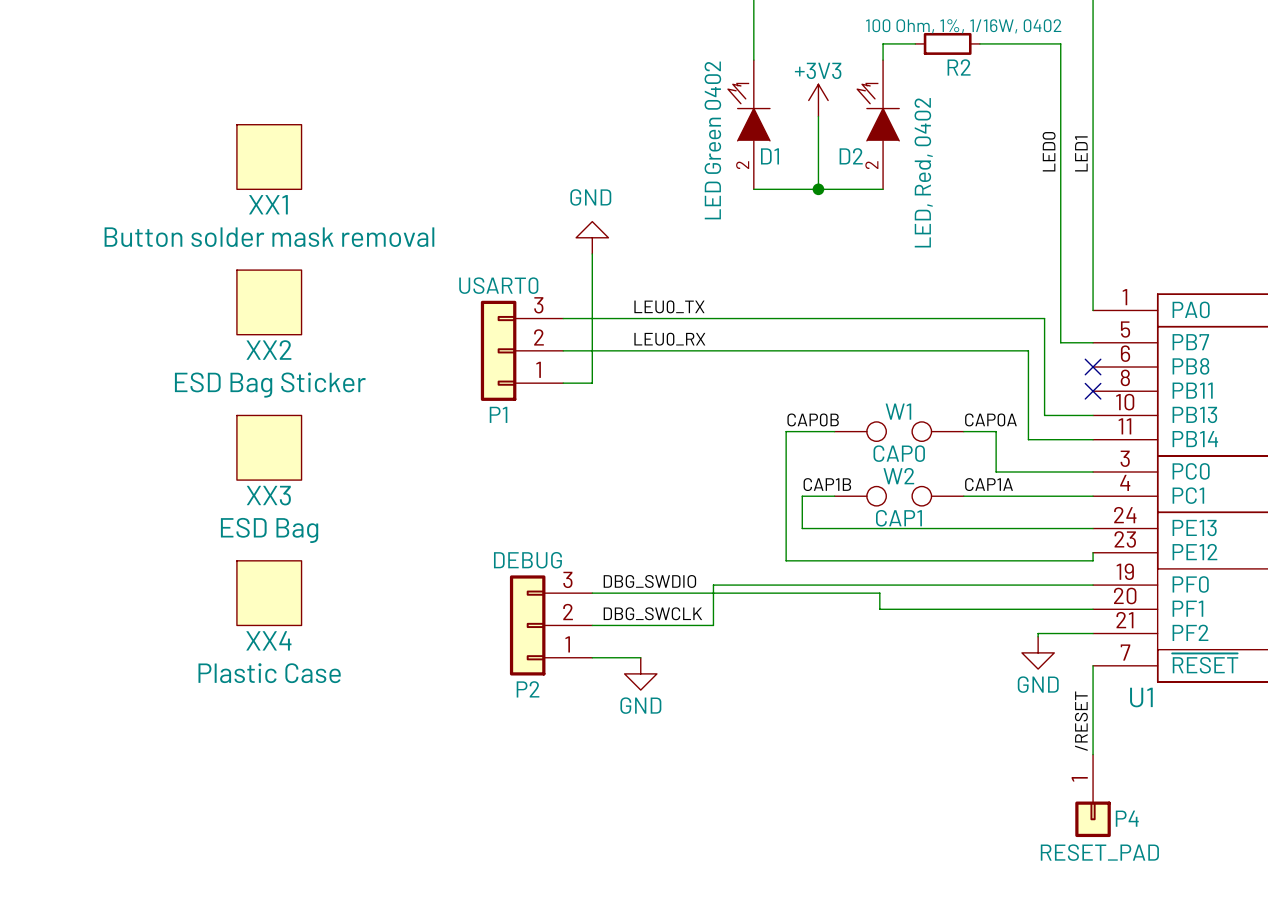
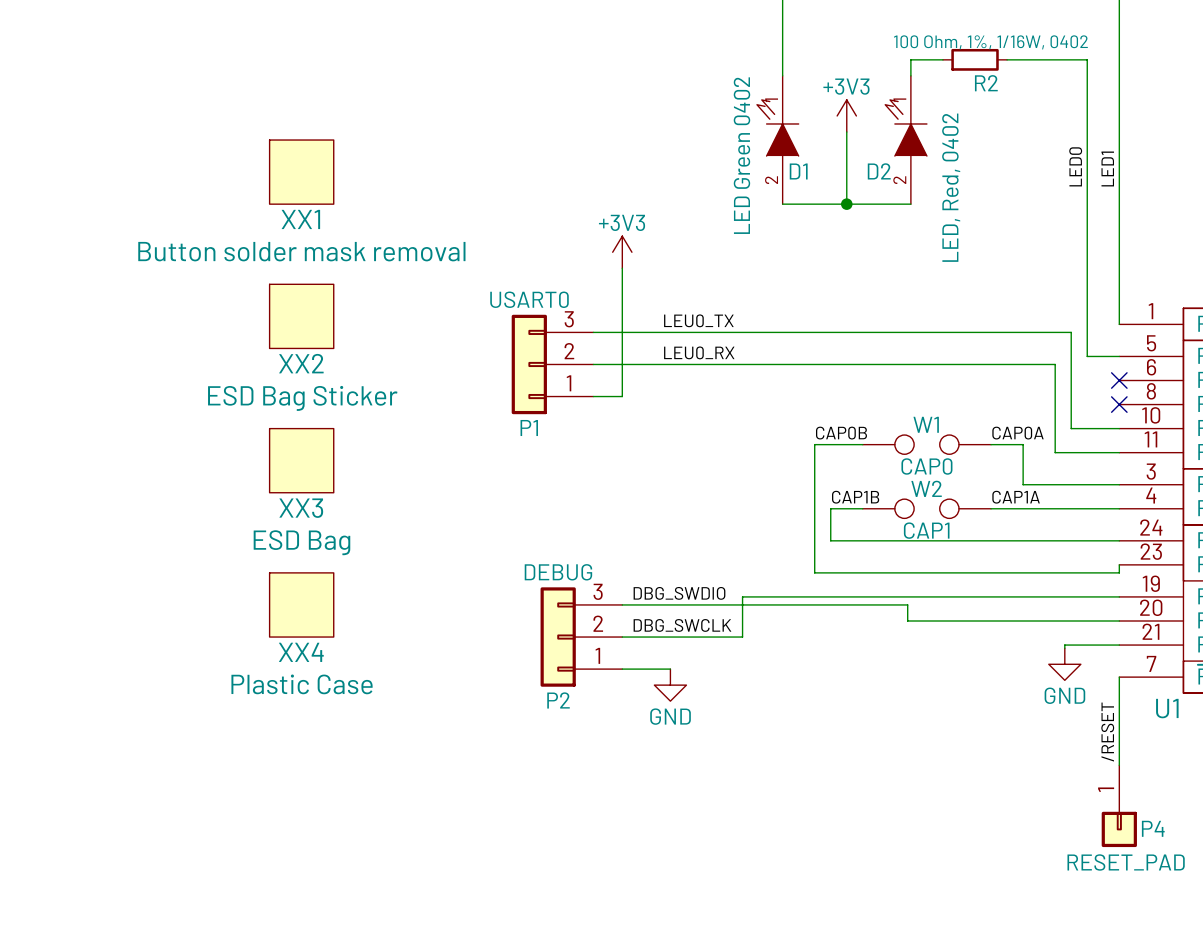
power symbol: GND (592, 237) -> +3V3 (622, 252)

